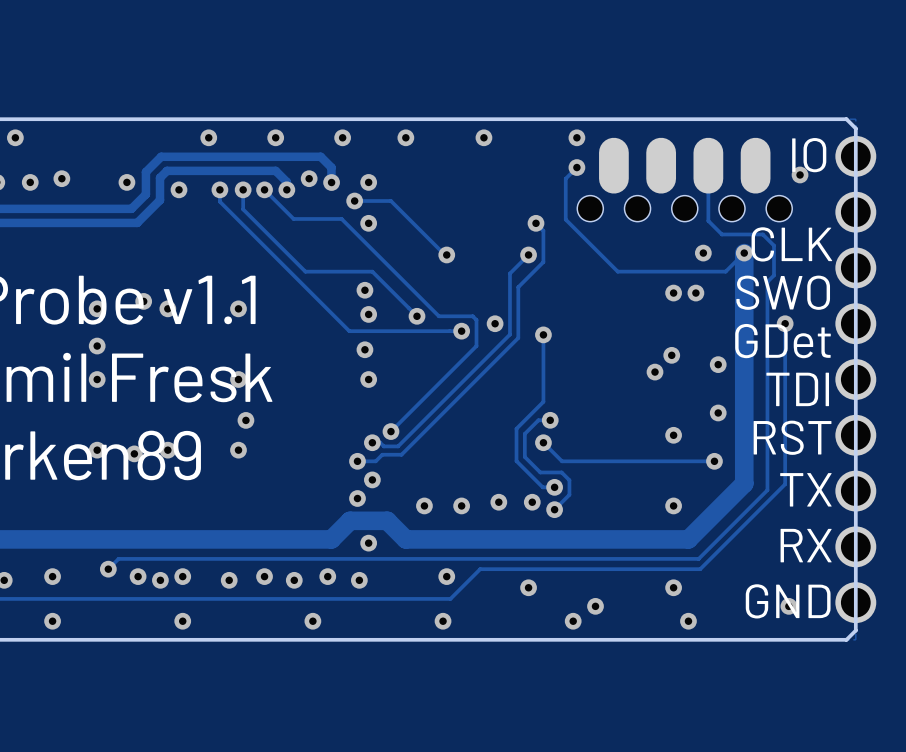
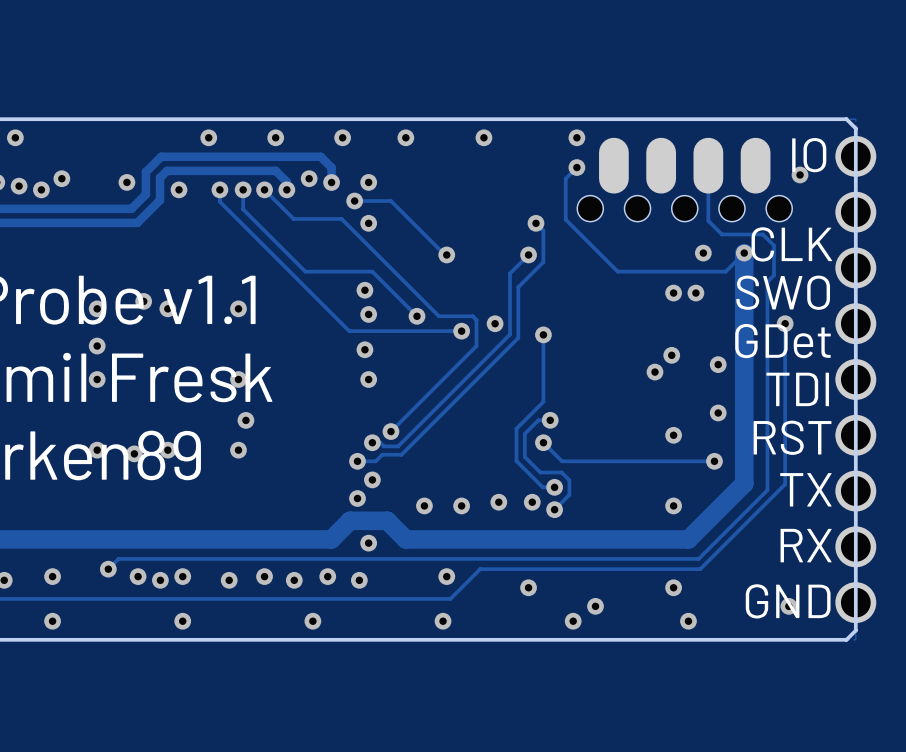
via: (30, 182) -> none
via: none -> (19, 186)
via: none -> (41, 189)

